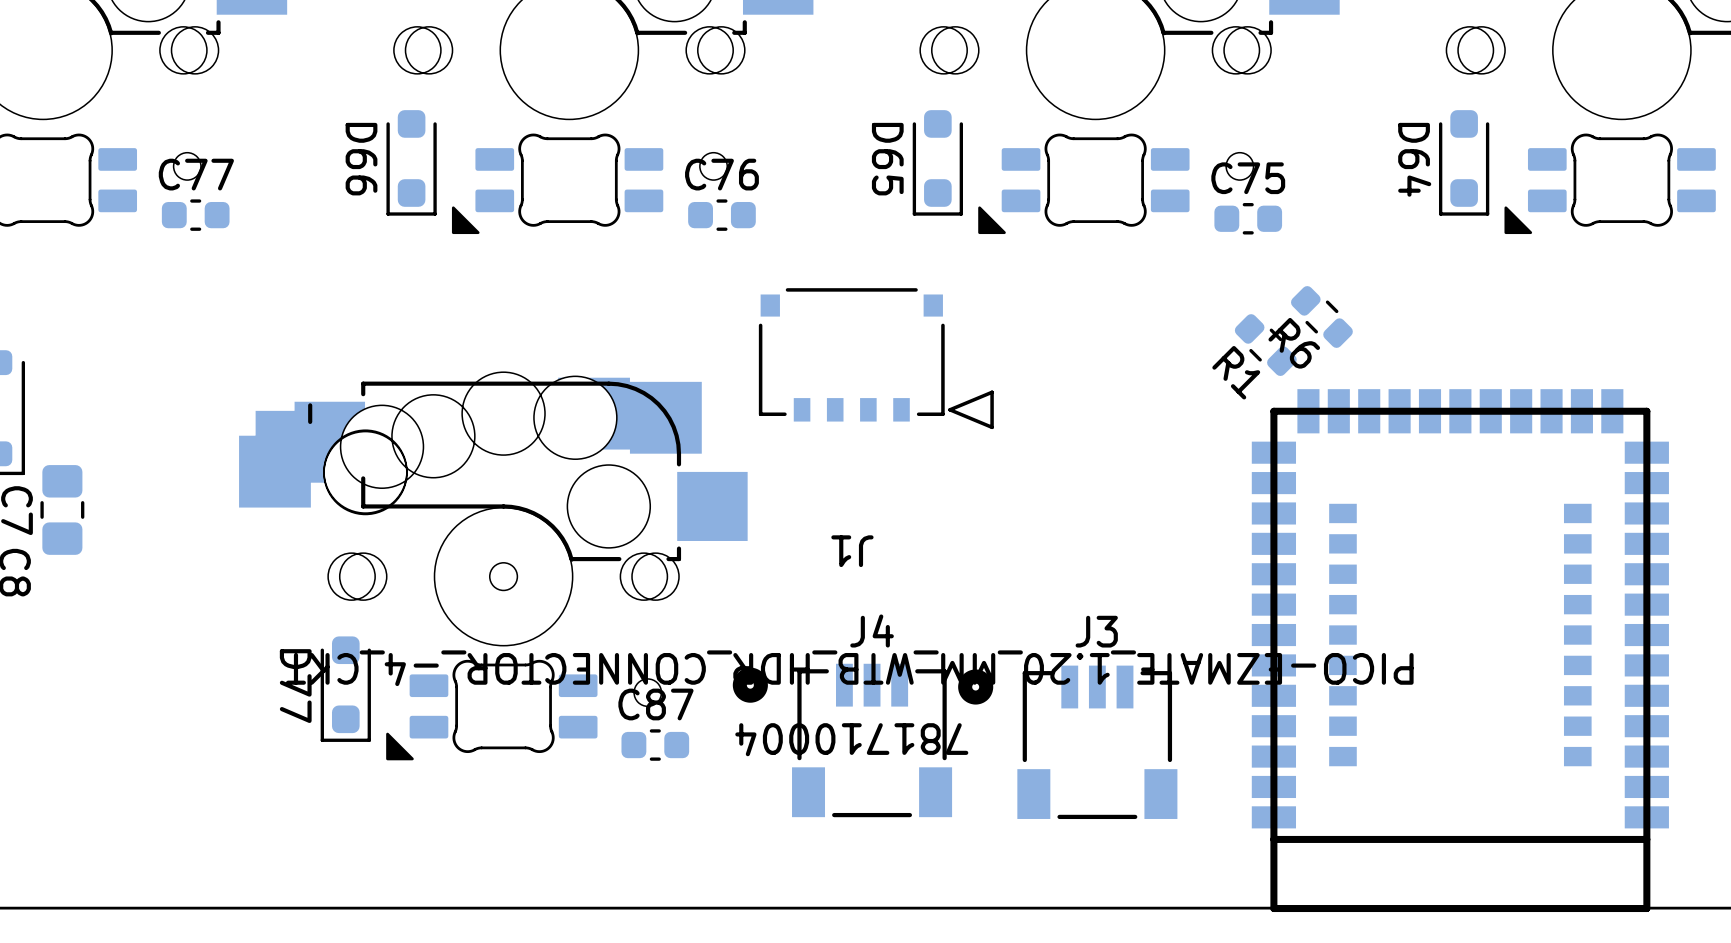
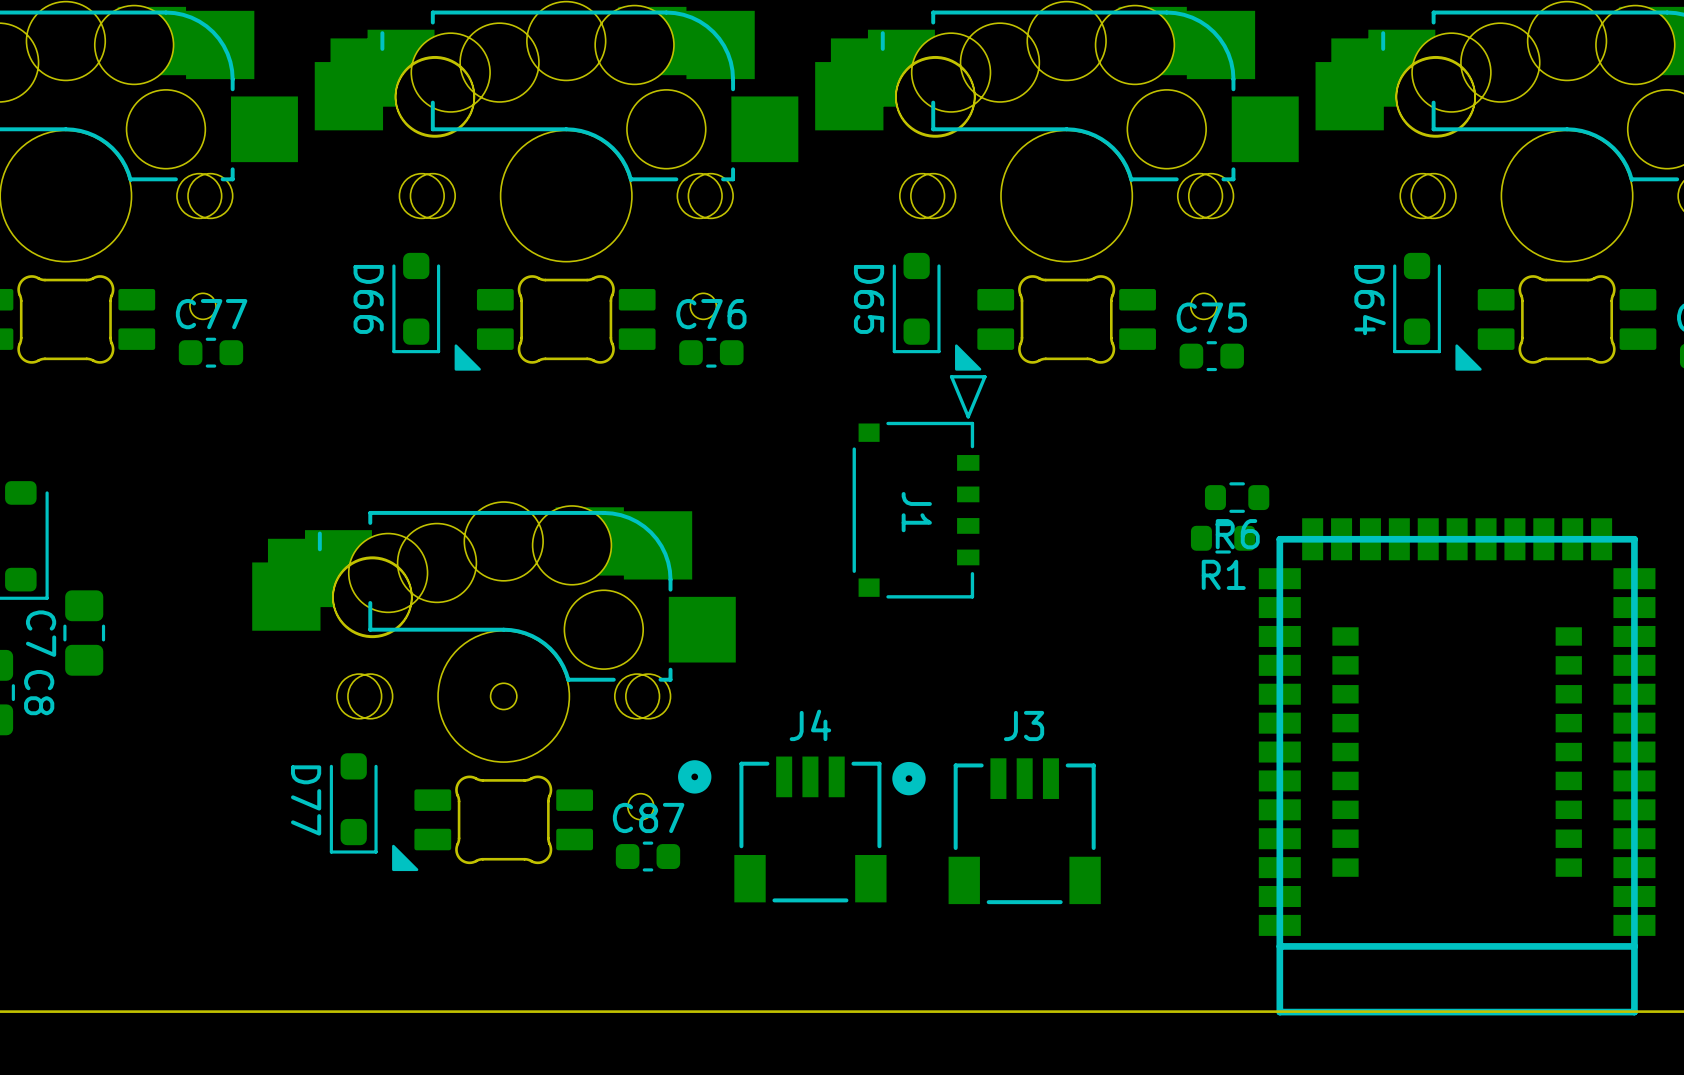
J1 footprint: [758, 288, 994, 430] -> [852, 375, 987, 599]
R6 rotation: 0° (1321, 316) -> 45° counterclockwise (1237, 497)
R6 position: (1321, 316) -> (1237, 497)
R1 rotation: 0° (1265, 345) -> 45° counterclockwise (1223, 538)
R1 position: (1265, 345) -> (1223, 538)
J1 name position: J1 (852, 551) -> J1 (916, 512)
part position: (1460, 650) -> (1457, 766)
J4 position: (842, 740) -> (782, 829)
J3 position: (1067, 742) -> (996, 831)

